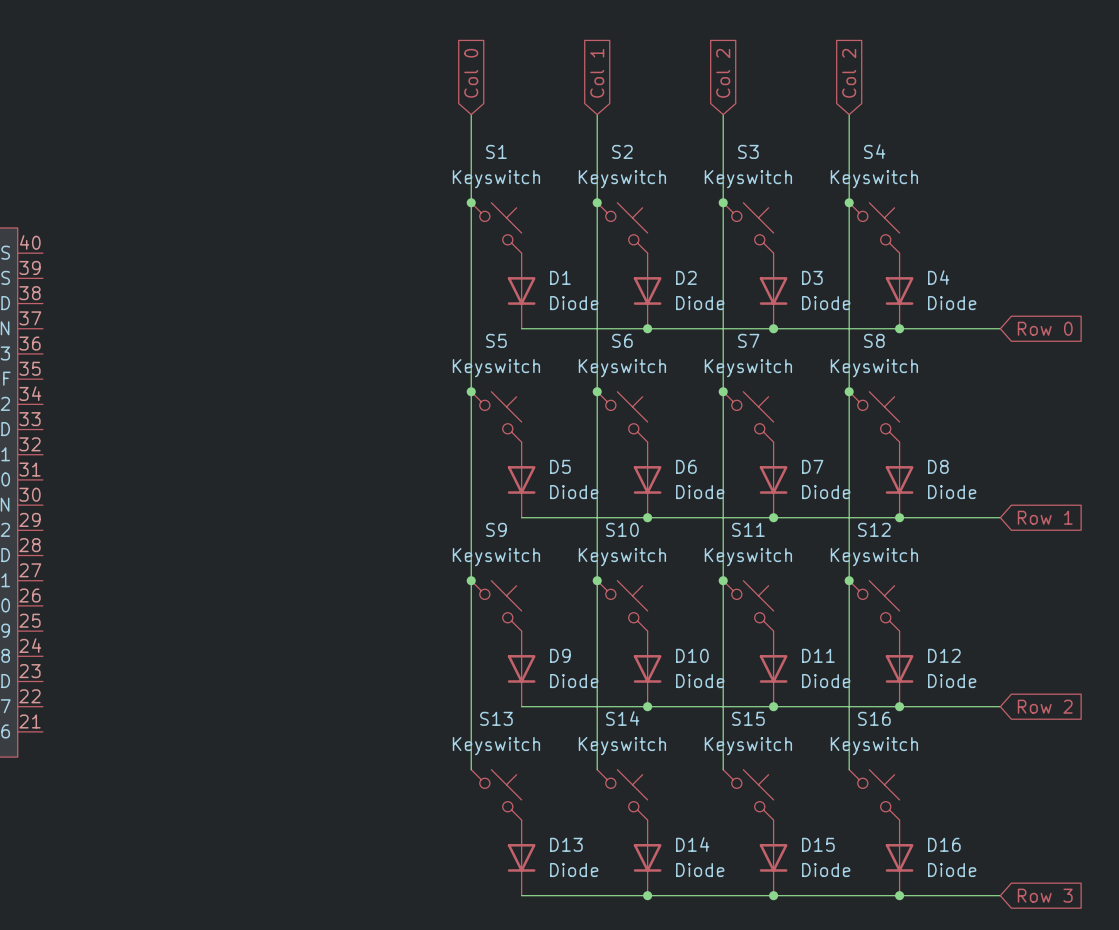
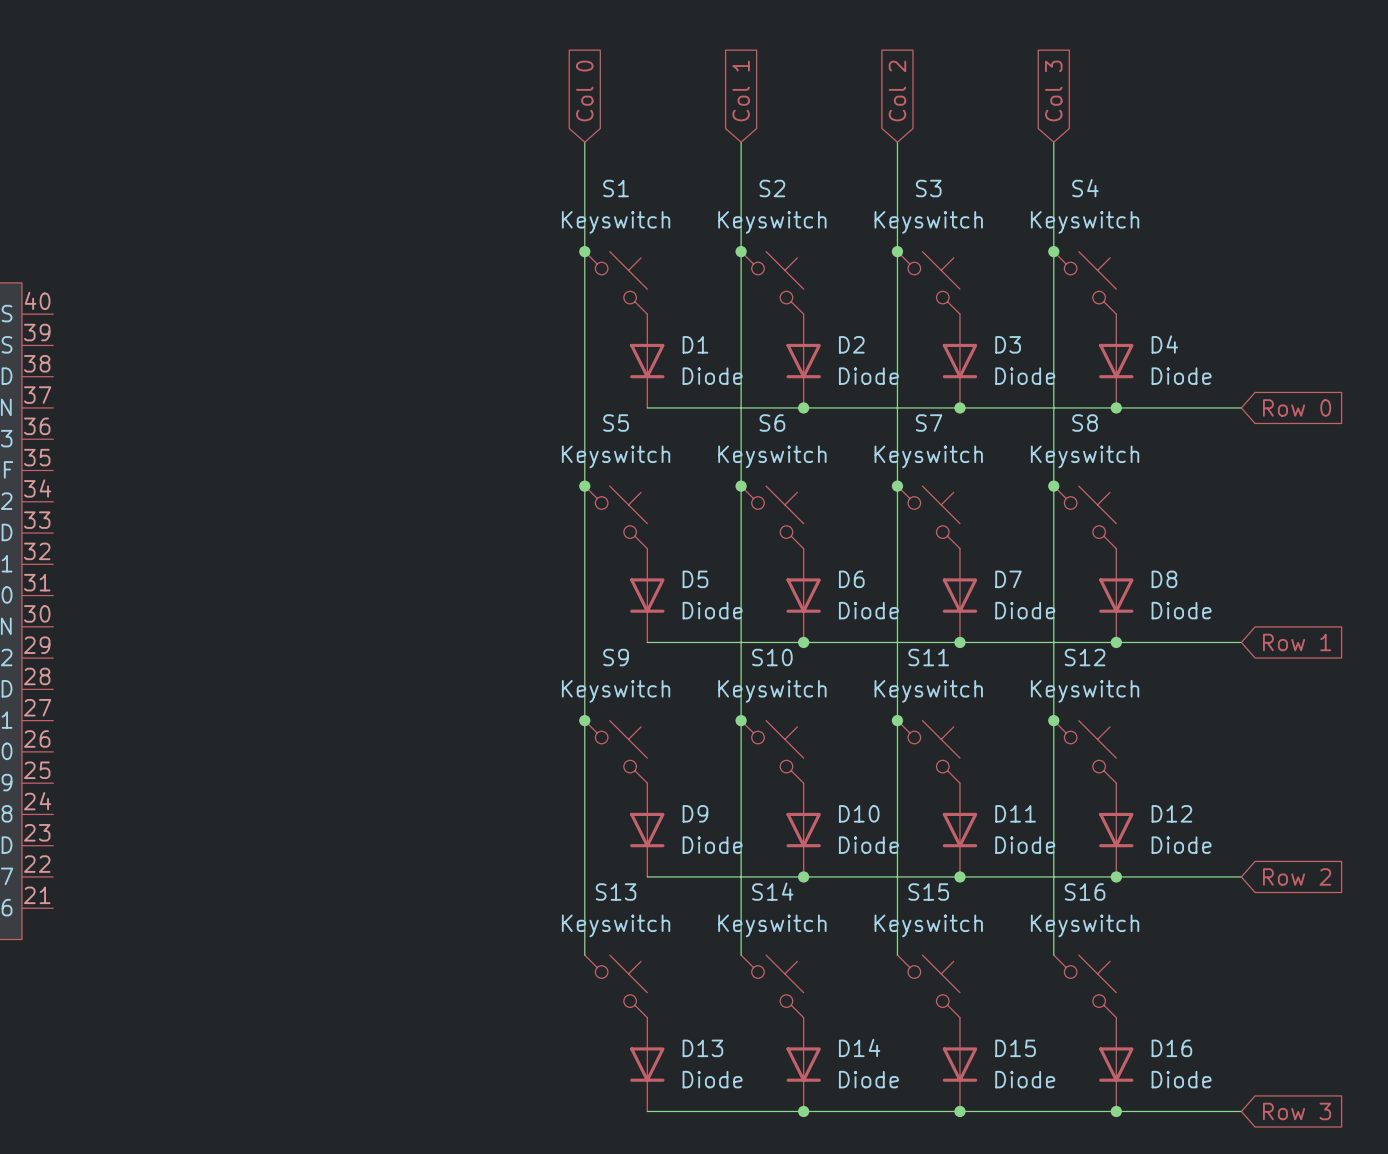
global label: Col 2 (849, 73) -> Col 3 (1053, 90)

